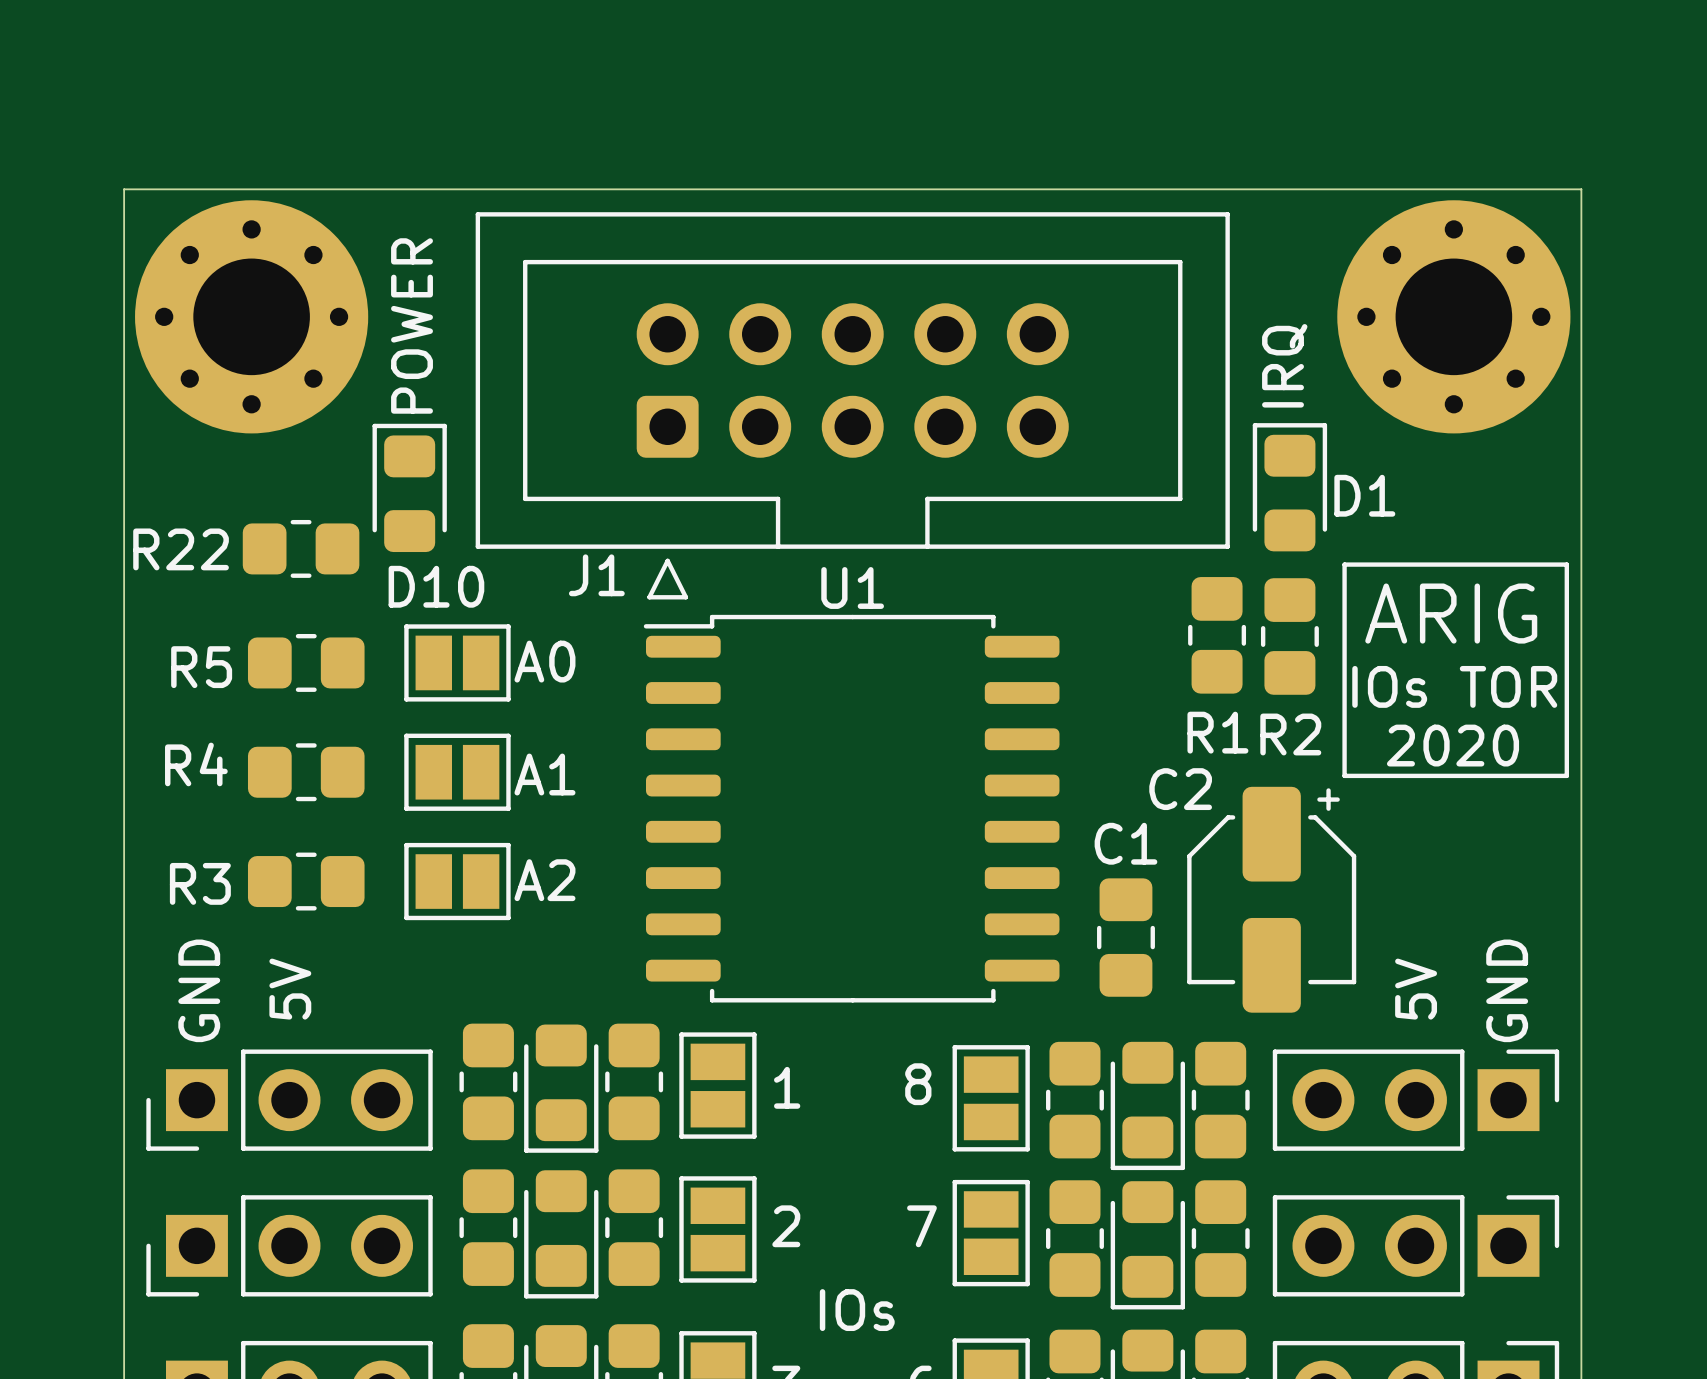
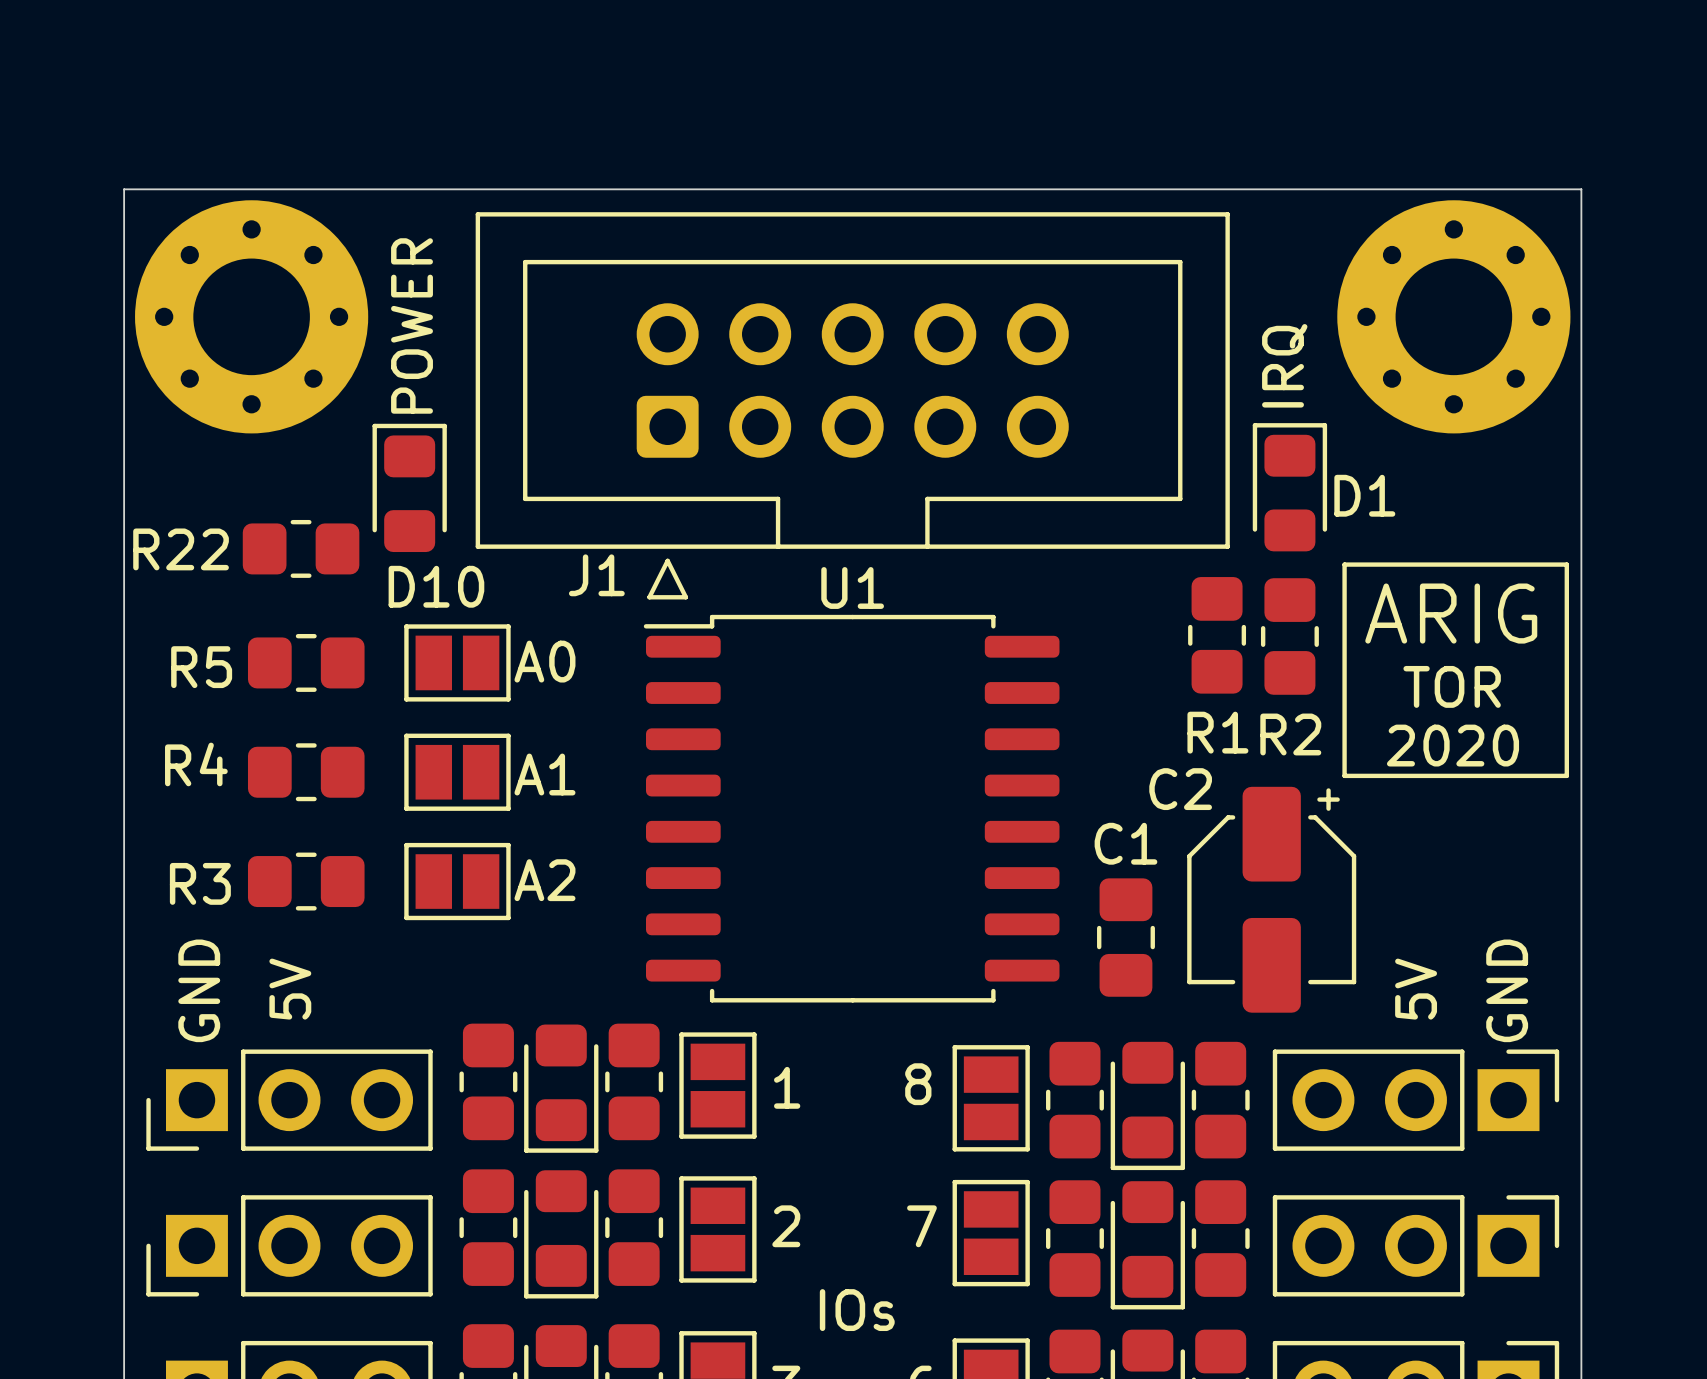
text: IOs TOR (1454, 686) -> TOR (1452, 686)

